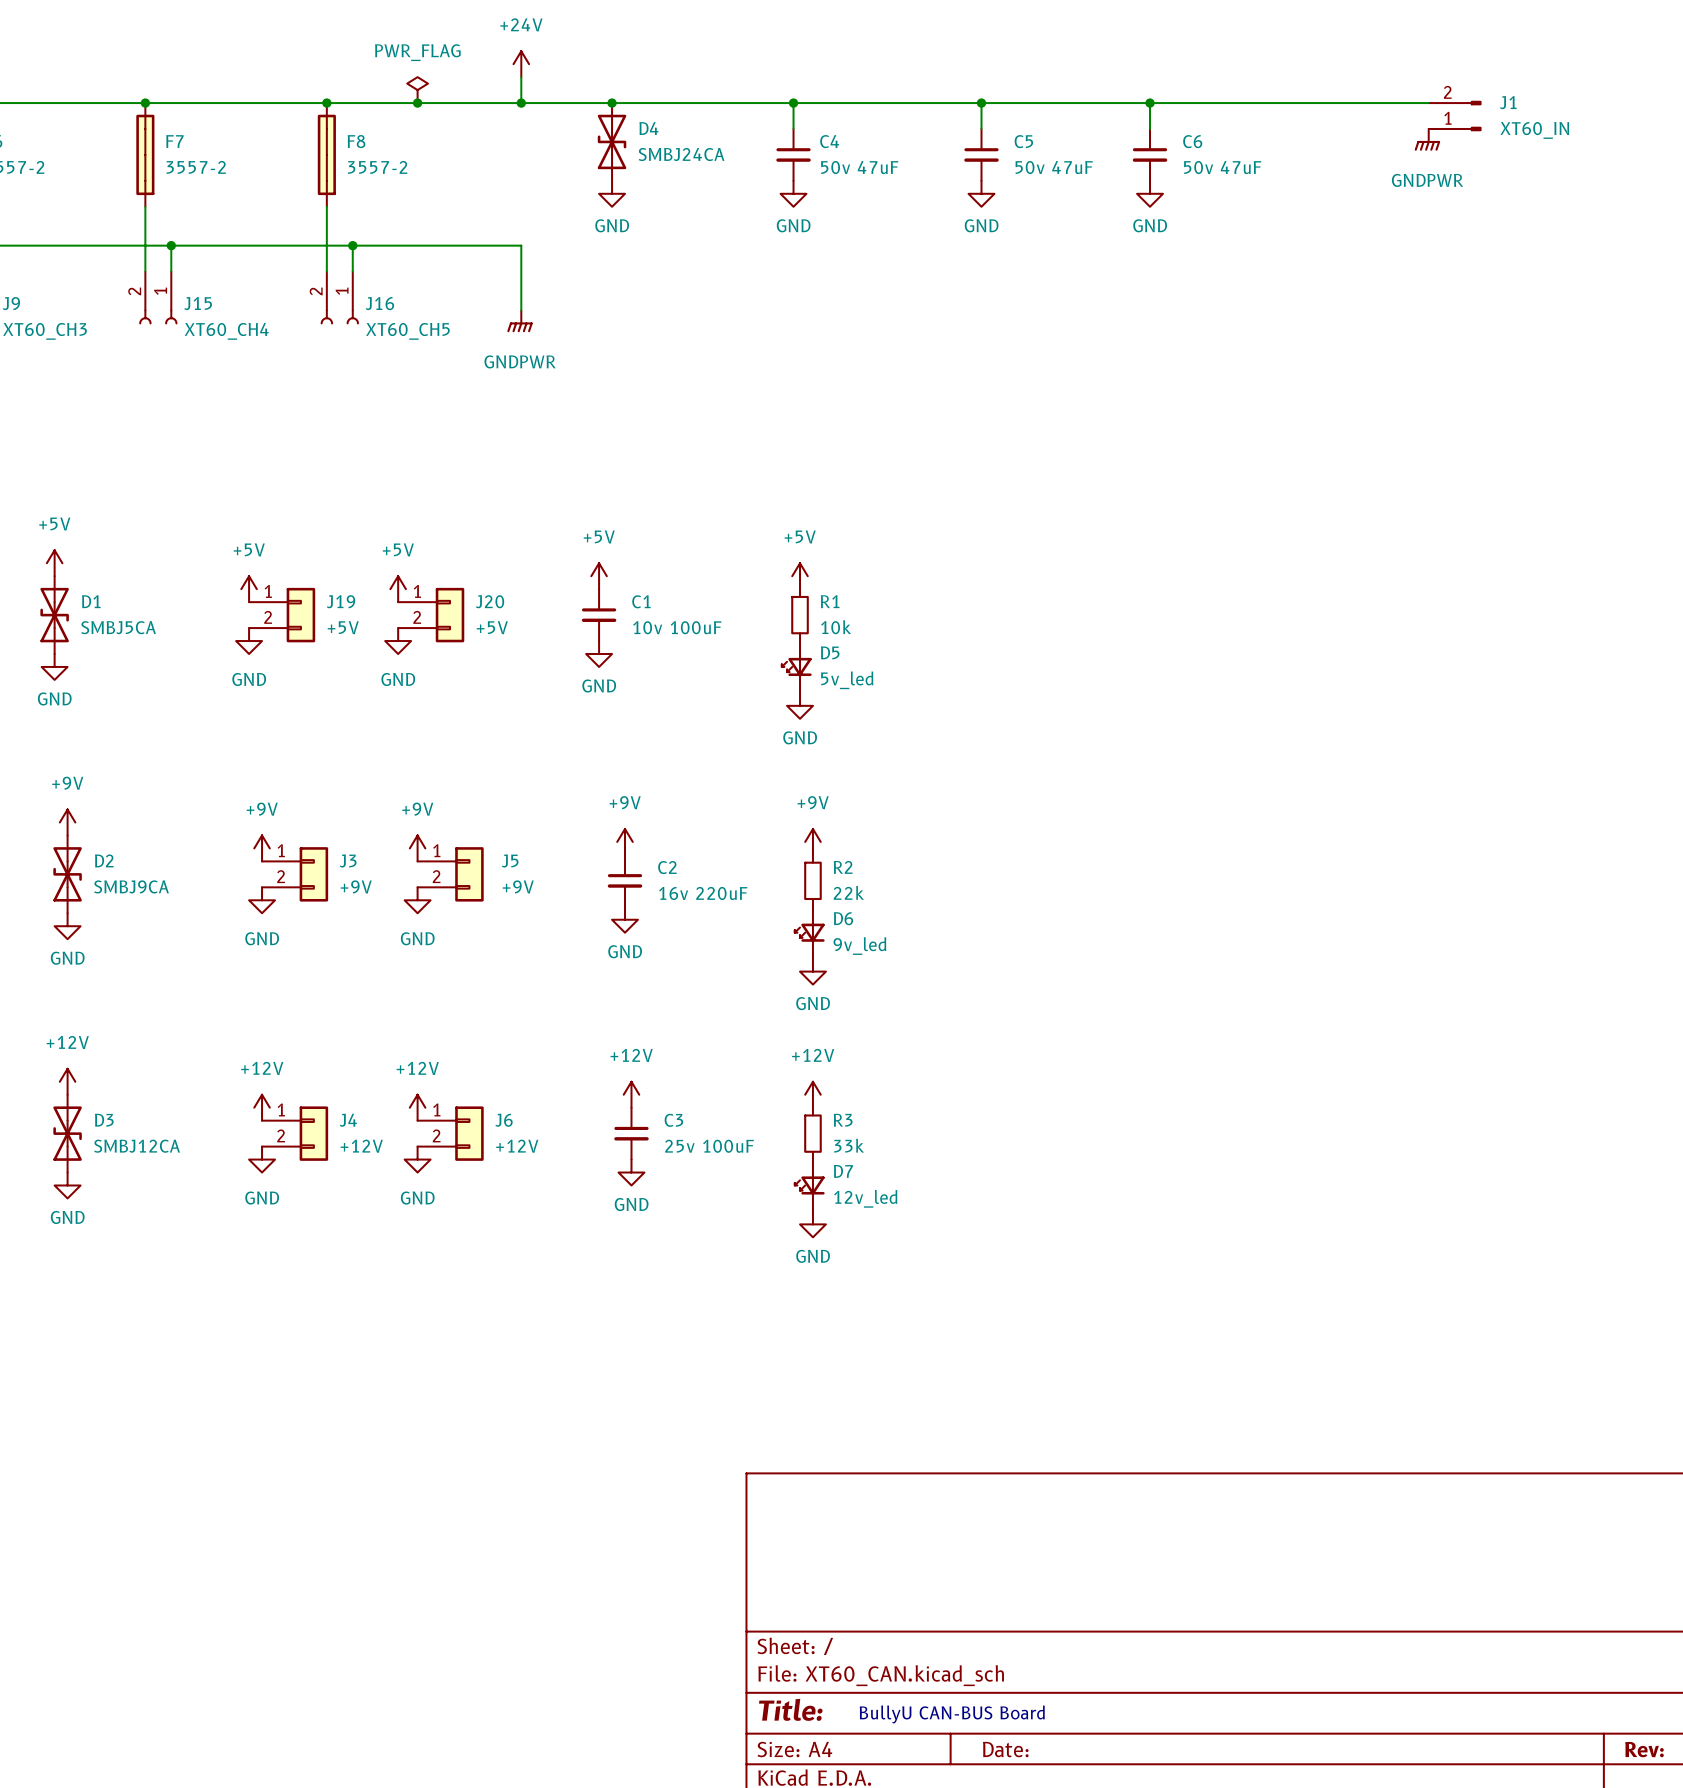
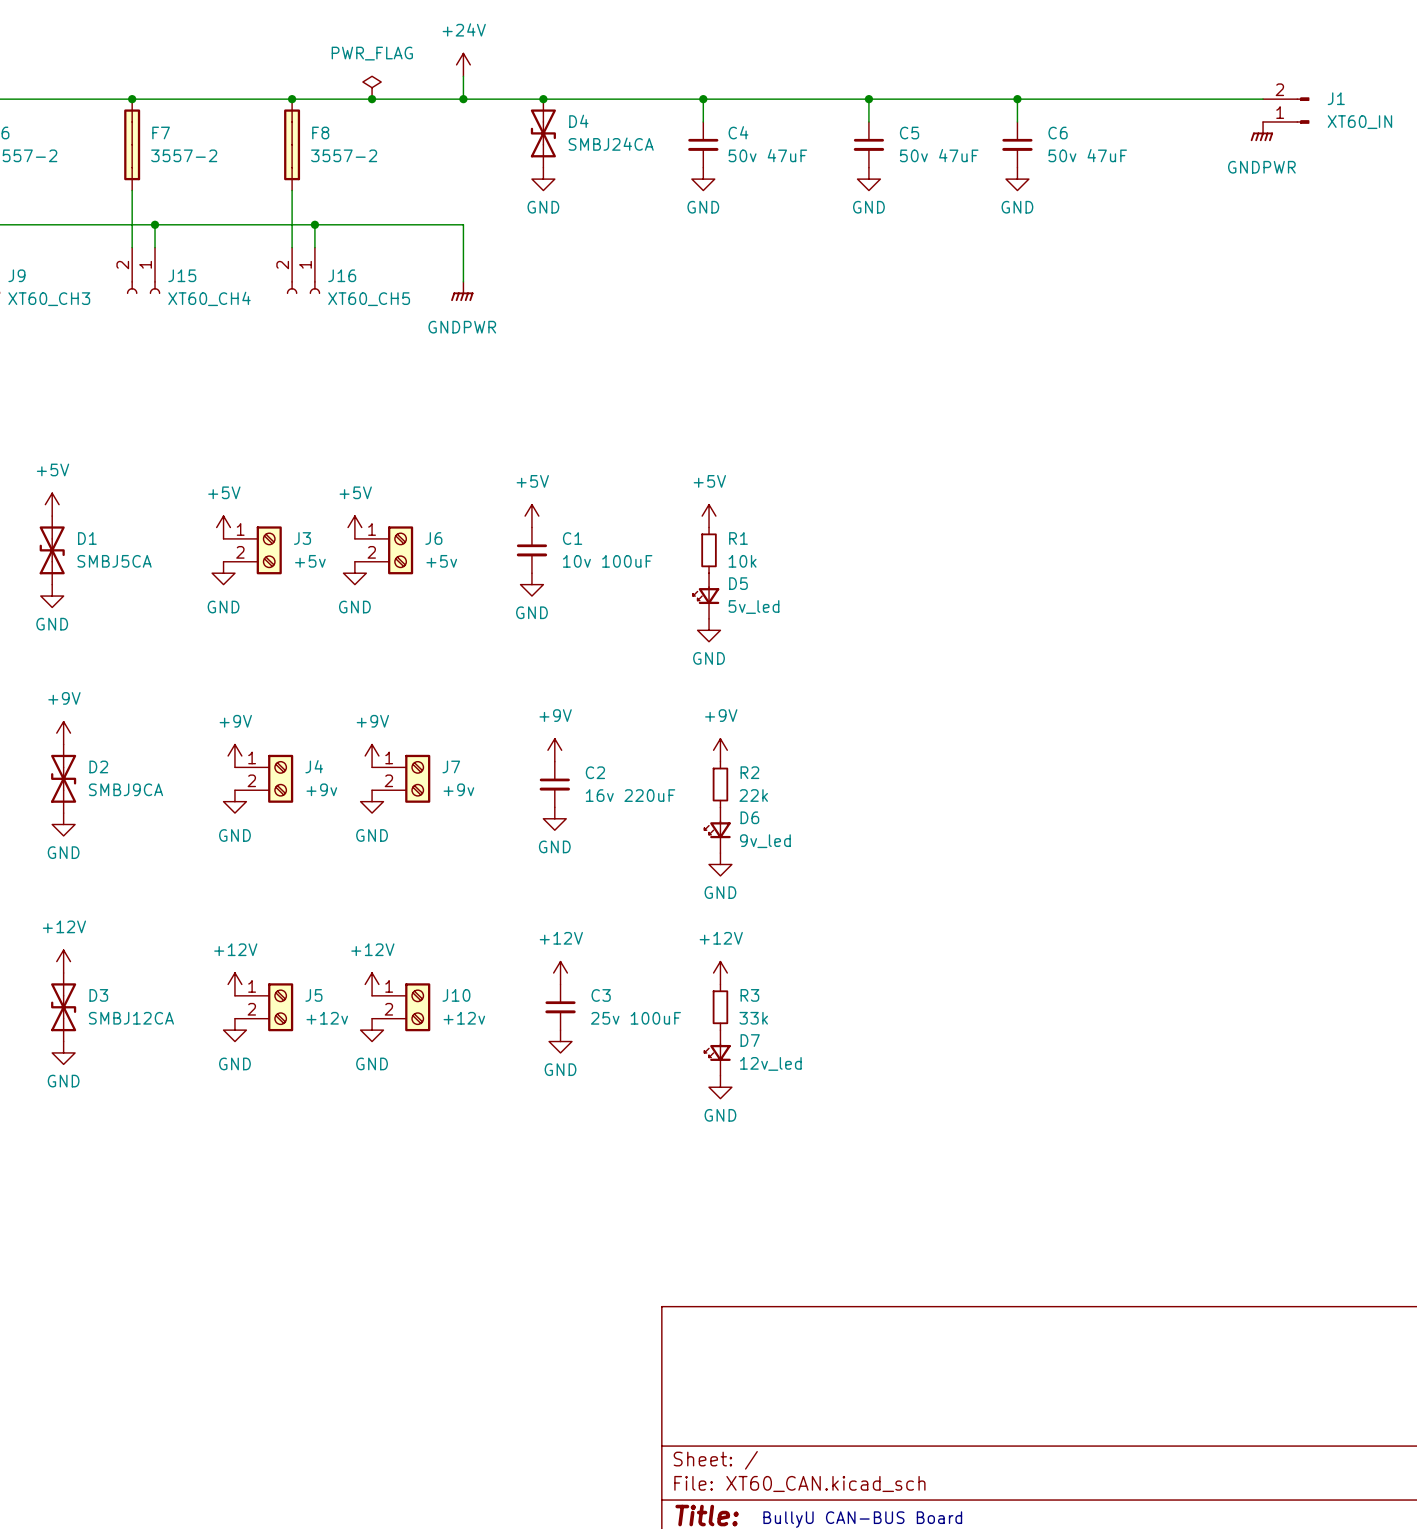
J19: +5V (282, 615) -> none
J20: +5V (431, 615) -> none
J3 symbol: [262, 847, 329, 902] -> [223, 526, 282, 575]
J5 symbol: [417, 847, 484, 902] -> [234, 983, 294, 1032]
J7: none -> +9v (401, 778)
J3 value: +9V (356, 886) -> +5v (310, 561)
J5 value: +9V (518, 886) -> +12v (327, 1018)
J4 symbol: [262, 1106, 329, 1161] -> [234, 754, 294, 803]
J6 symbol: [417, 1106, 484, 1161] -> [354, 526, 414, 575]
J10: none -> +12v (401, 1007)
J4 value: +12V (361, 1146) -> +9v (321, 789)
J6 value: +12V (517, 1146) -> +5v (441, 561)

